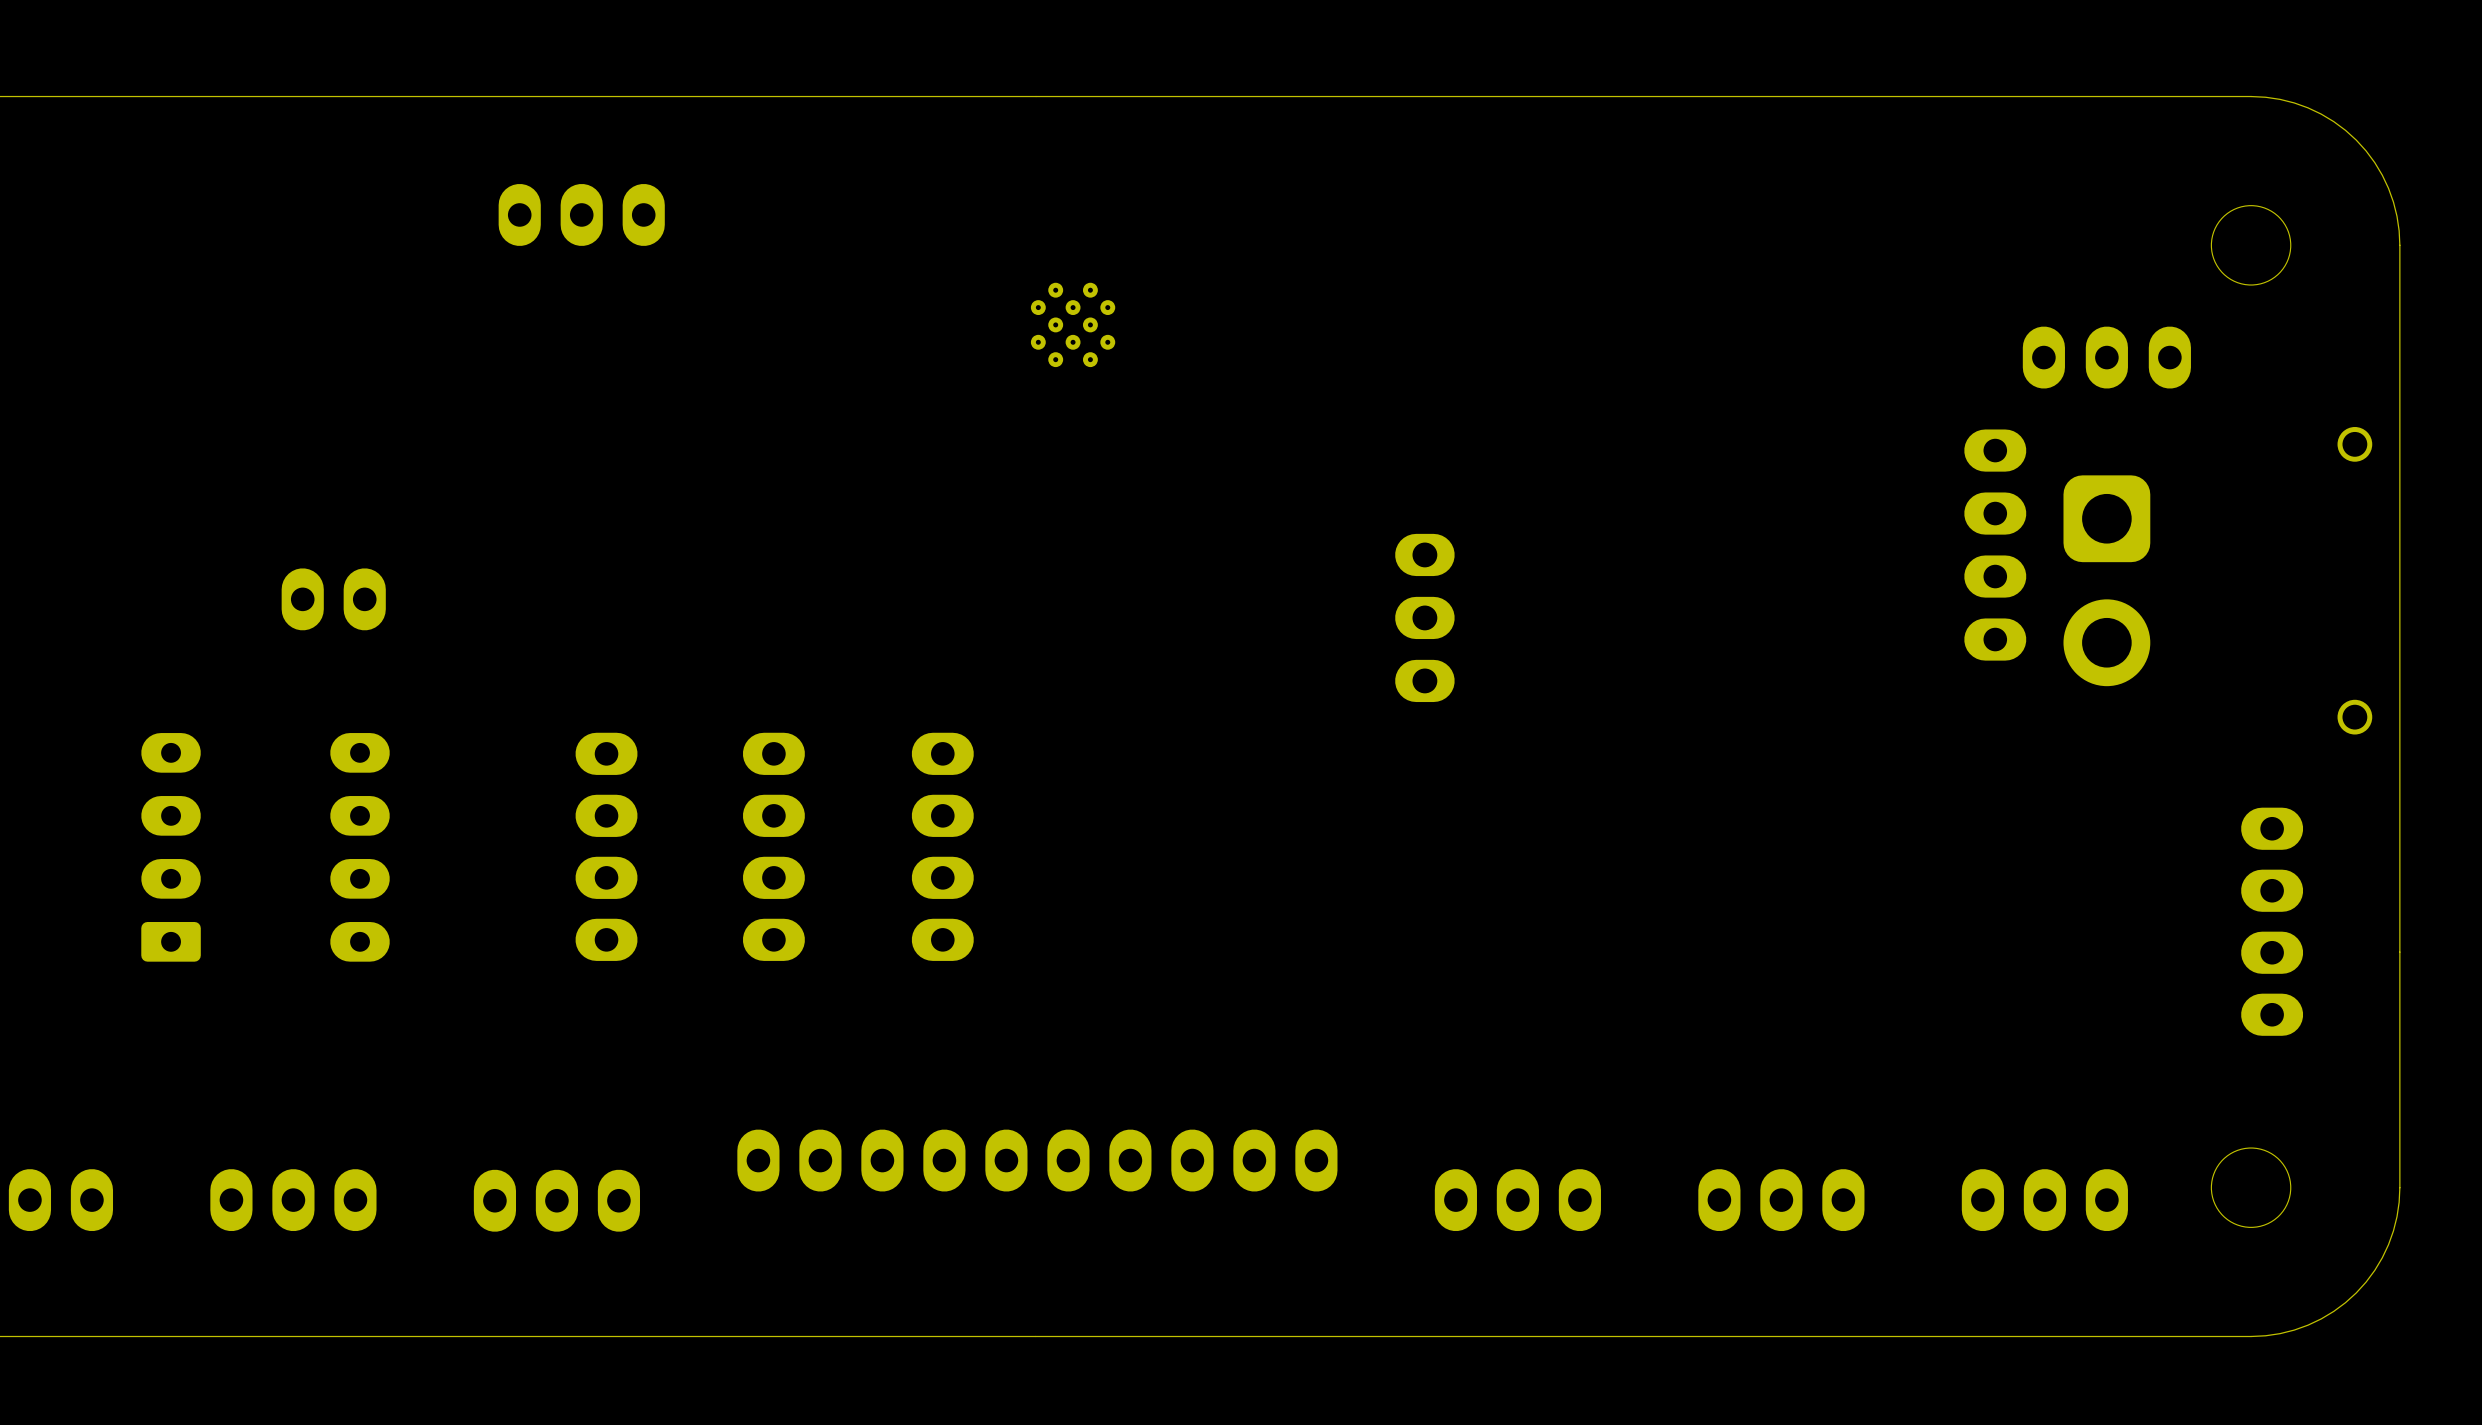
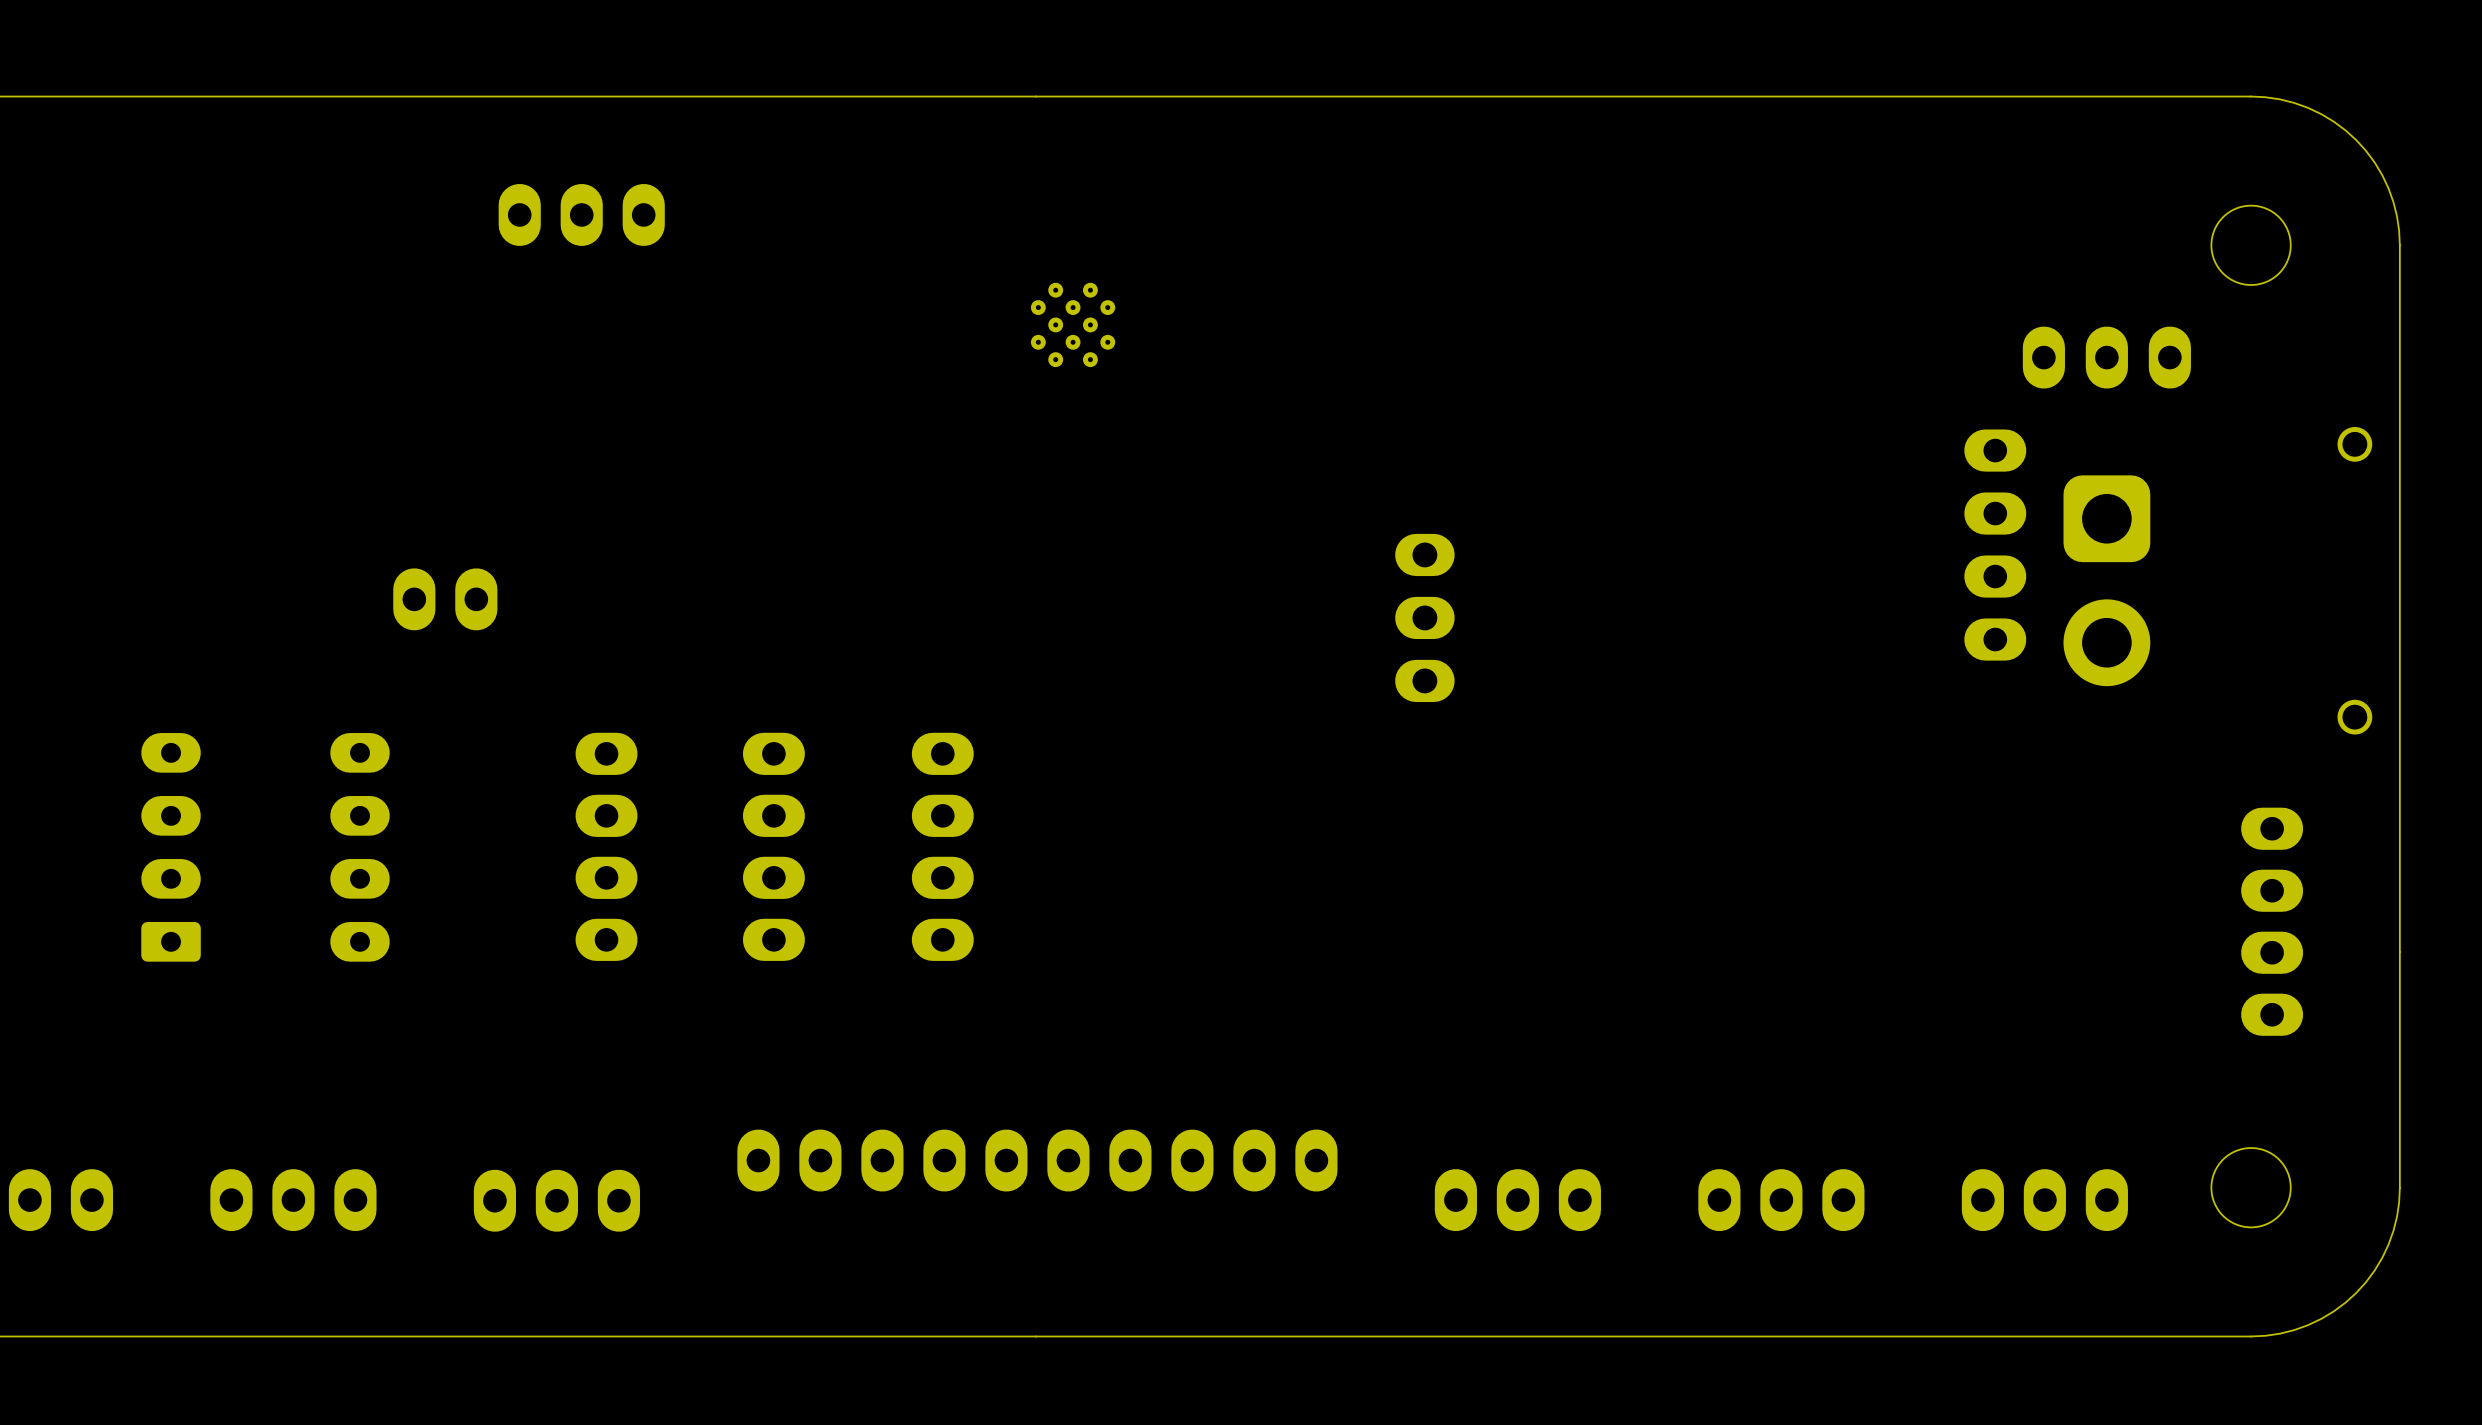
part position: (333, 599) -> (445, 599)

